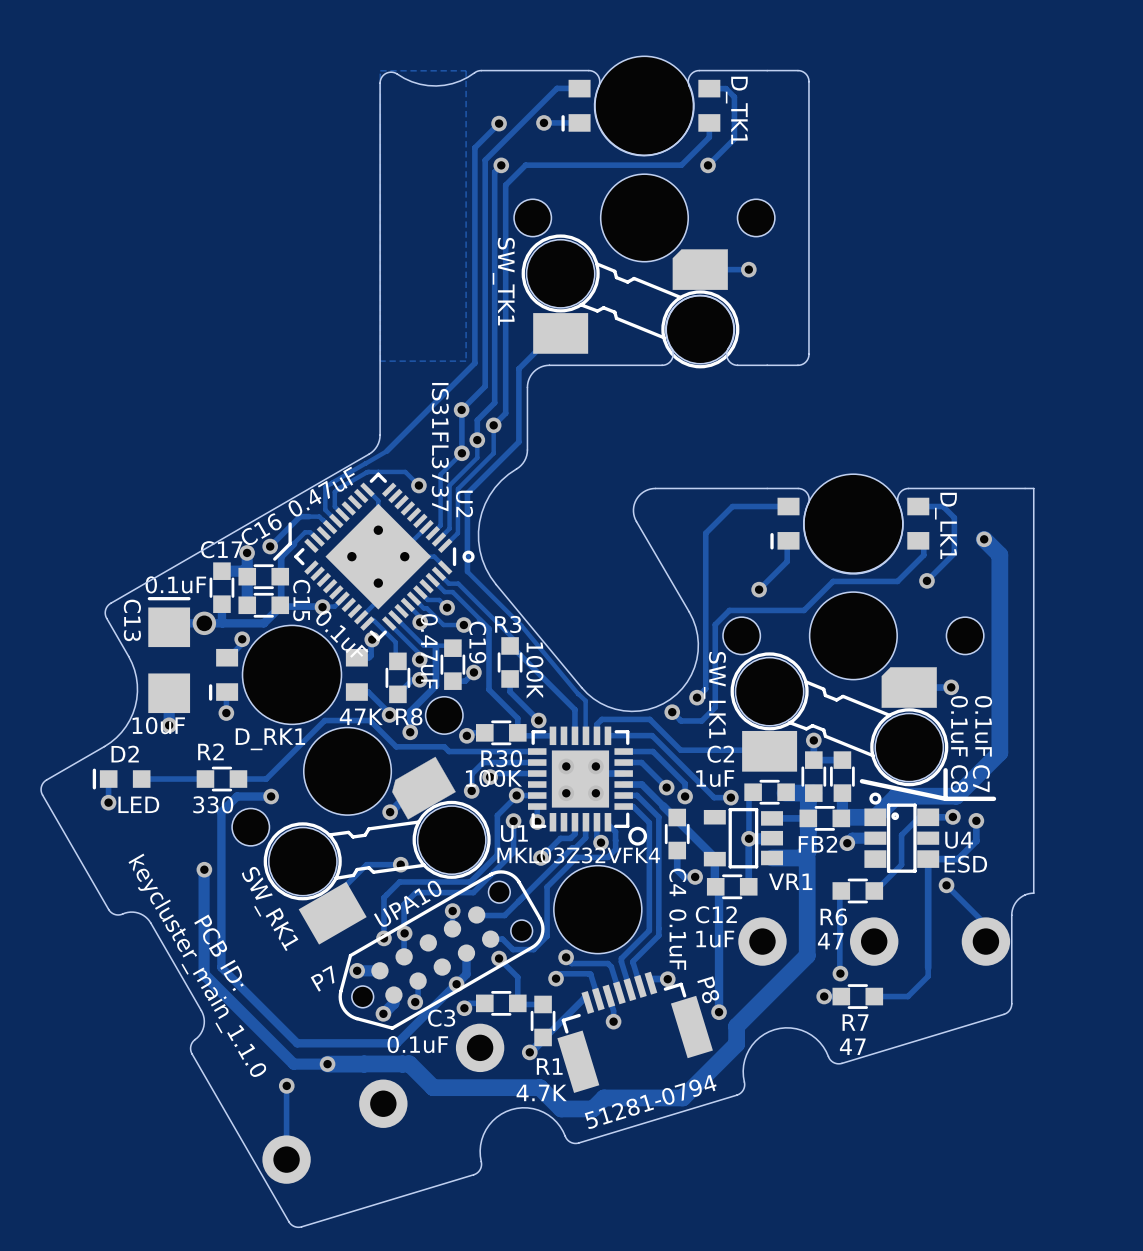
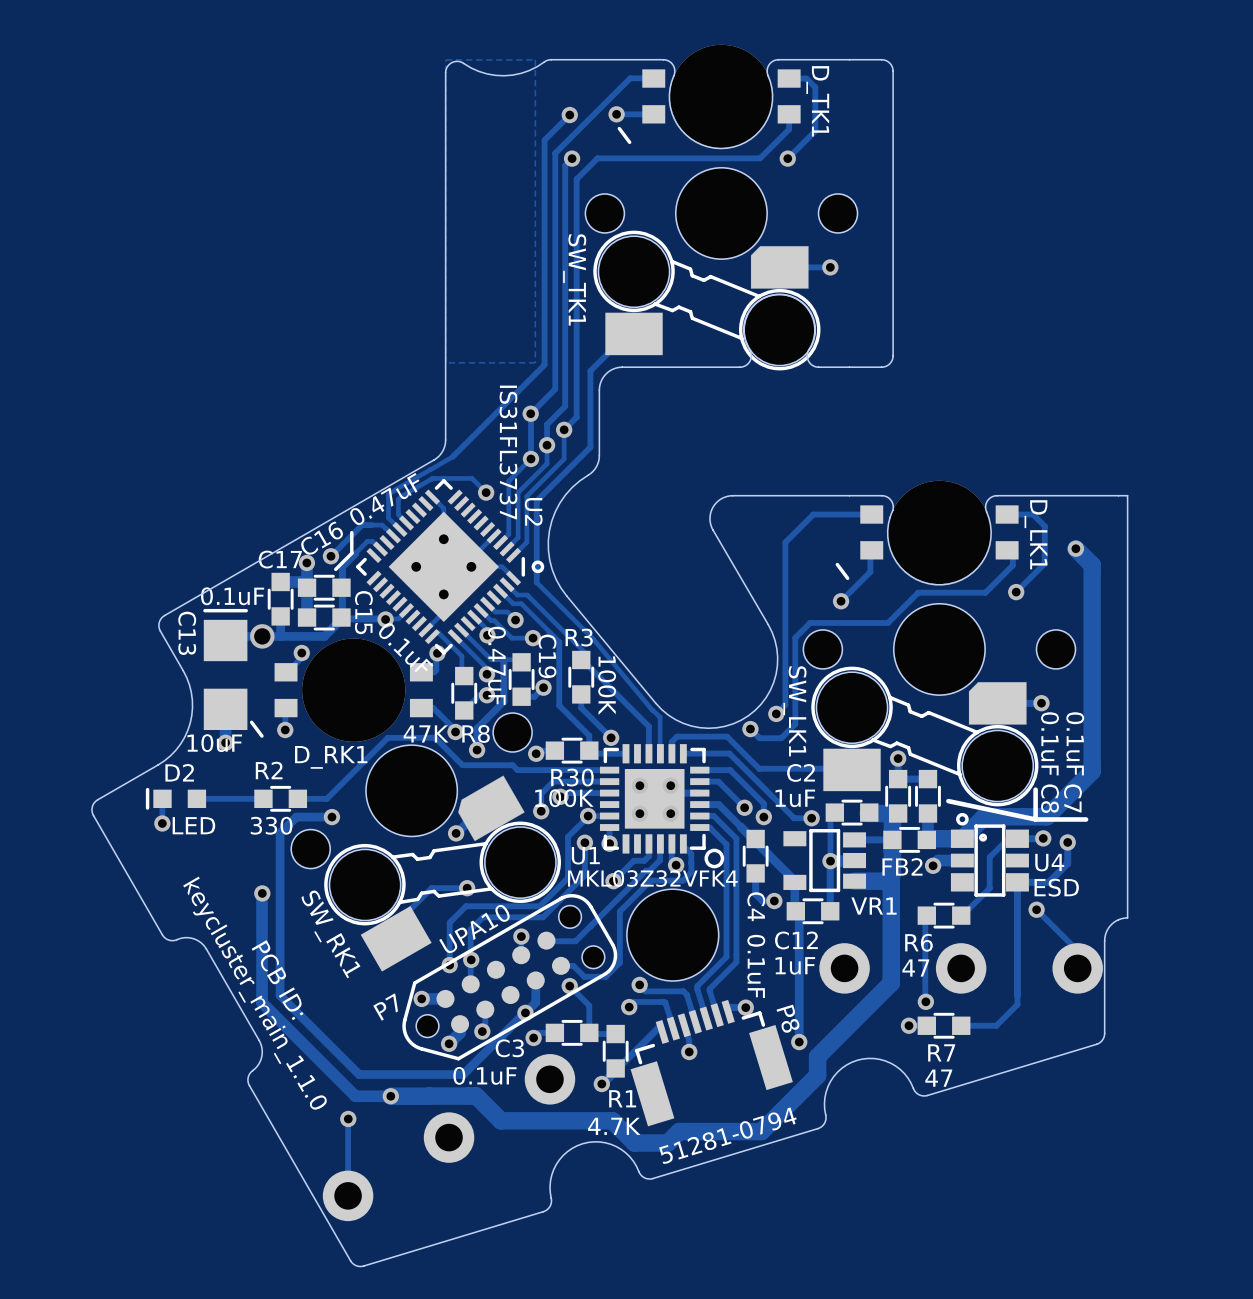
D_TK1 footprint: [561, 56, 721, 156] -> [617, 44, 801, 149]
D_LK1 footprint: [770, 474, 930, 574] -> [835, 480, 1019, 585]
D_RK1 footprint: [208, 625, 368, 725] -> [249, 638, 433, 742]

